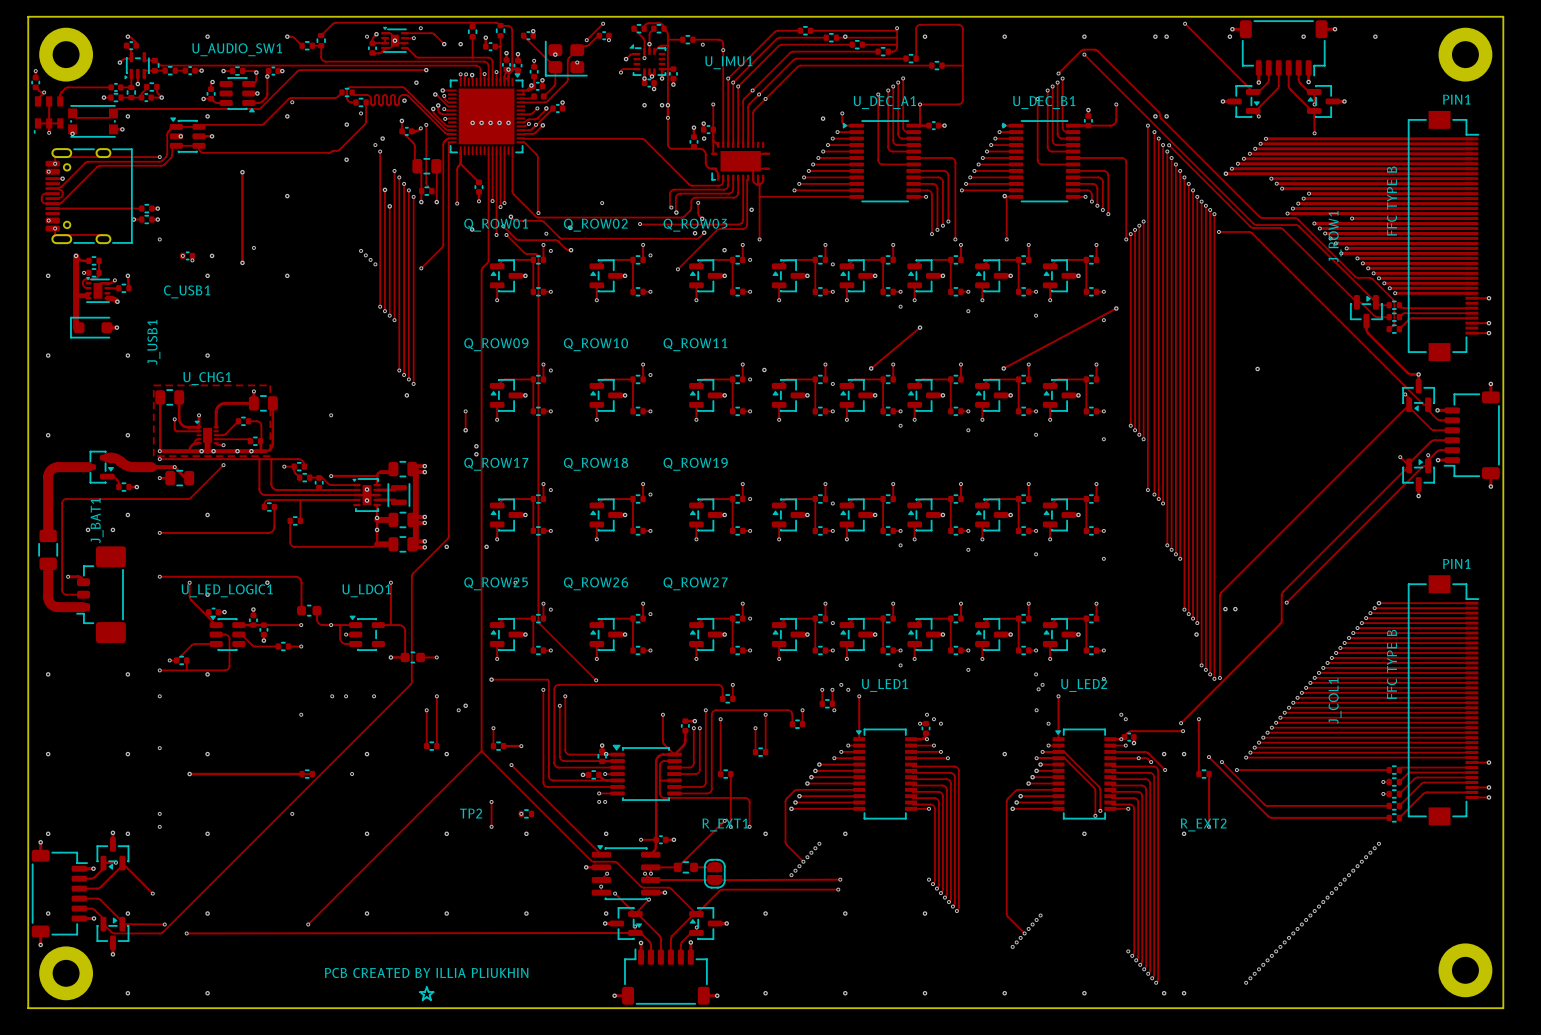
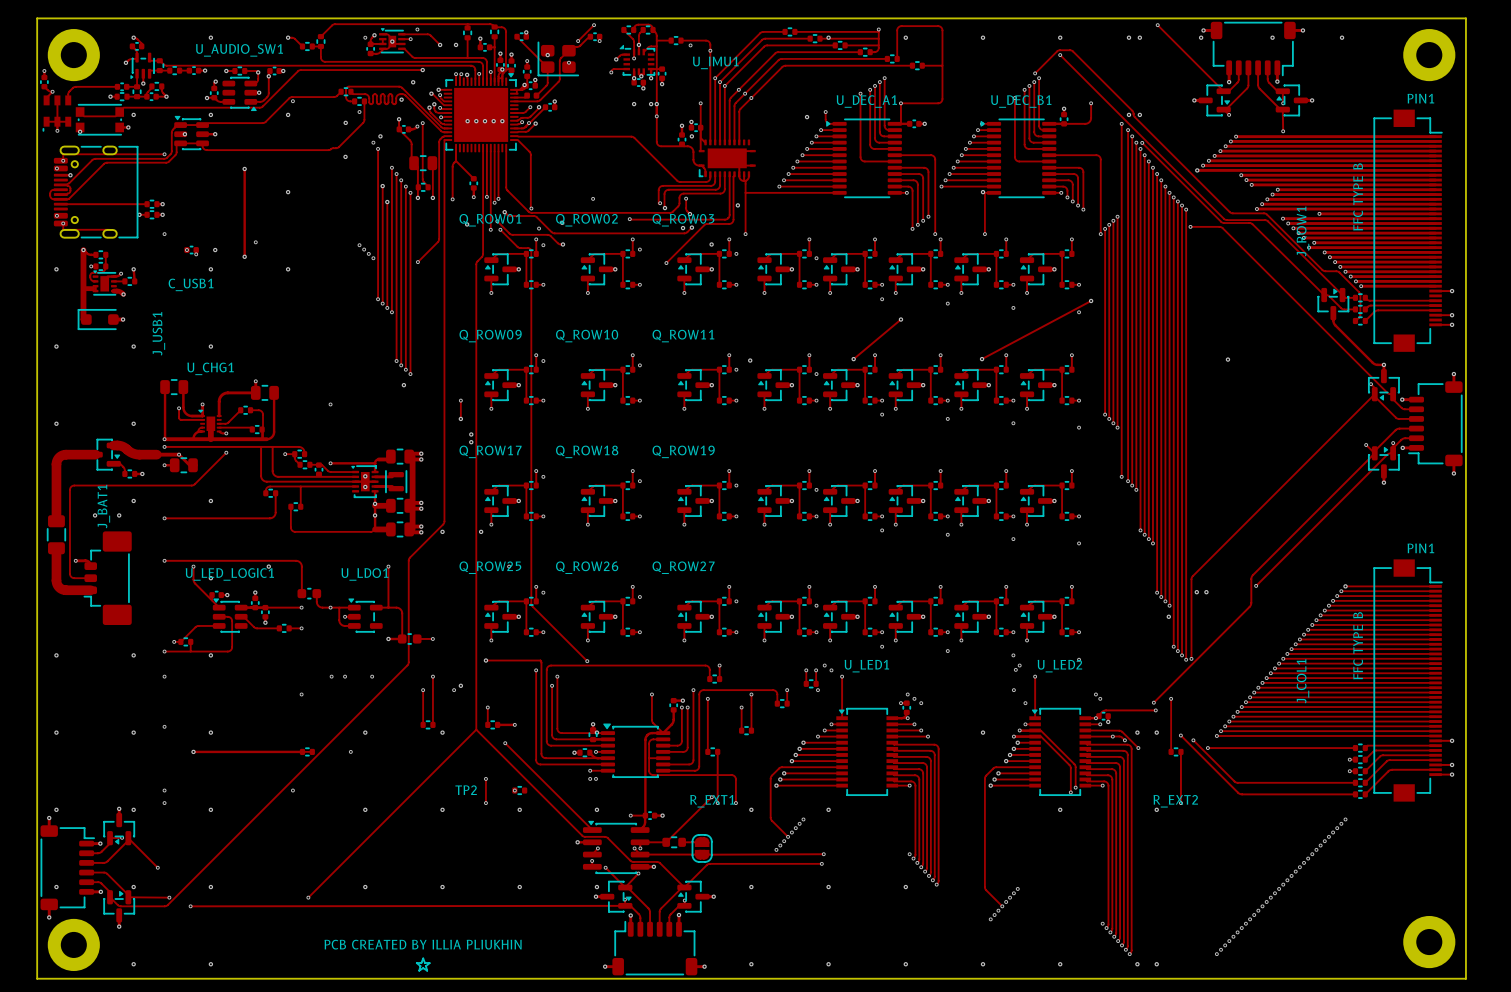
zone outline: (153, 385) (270, 385) (270, 456) (153, 456) (153, 385) -> none
via: (201, 451) -> none
via: (213, 451) -> none
via: (237, 451) -> none
via: (251, 451) -> none

